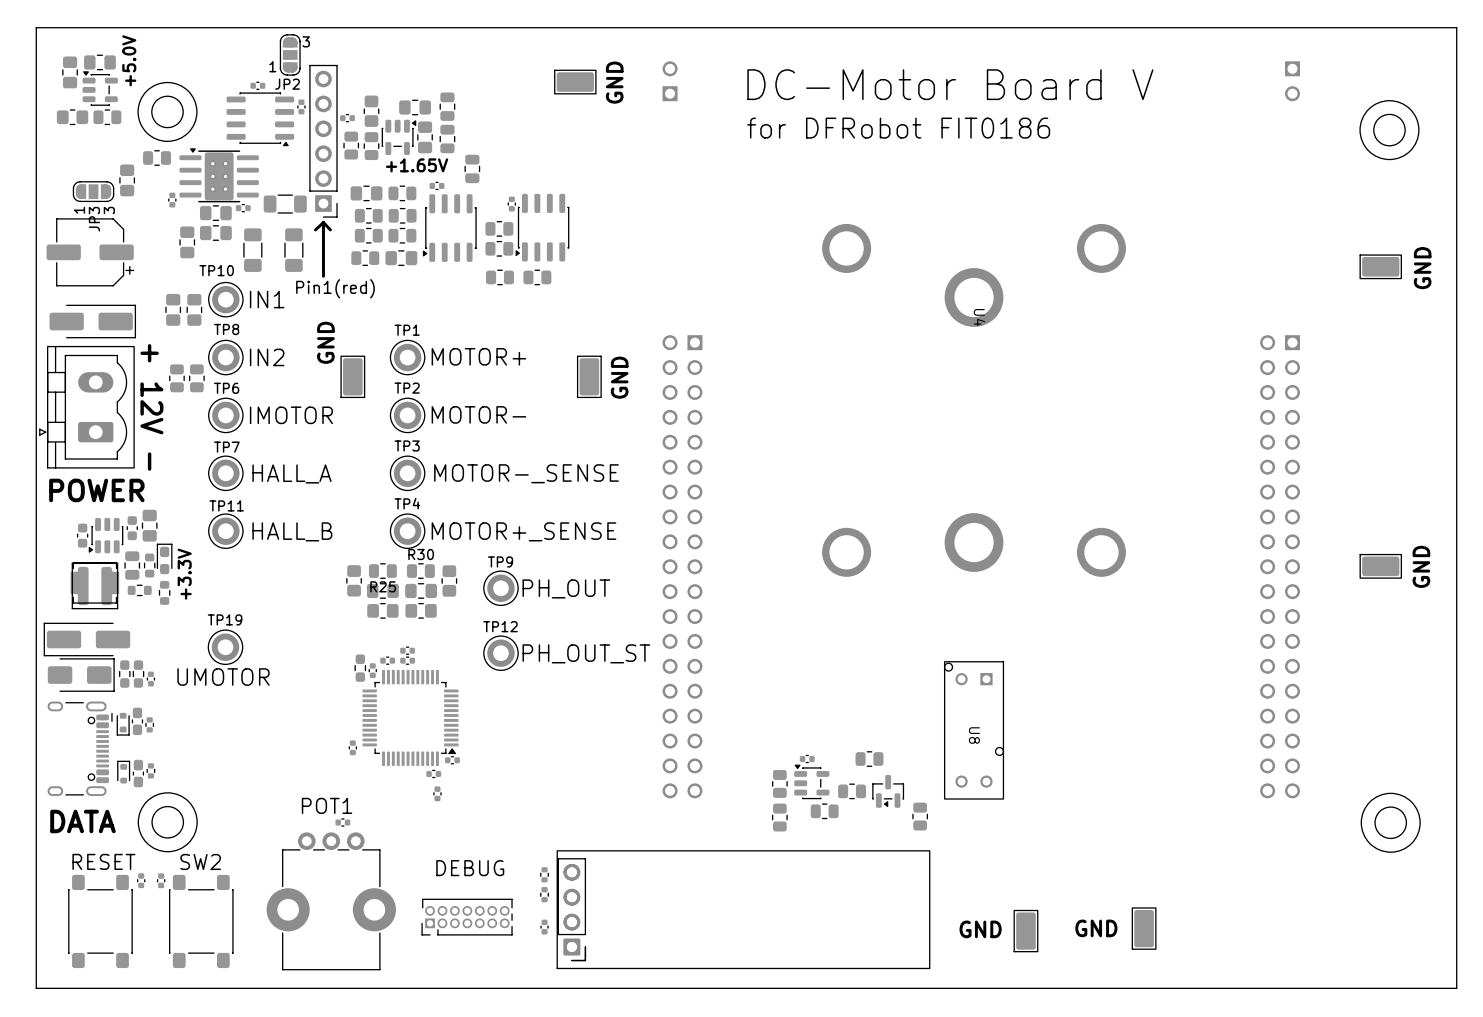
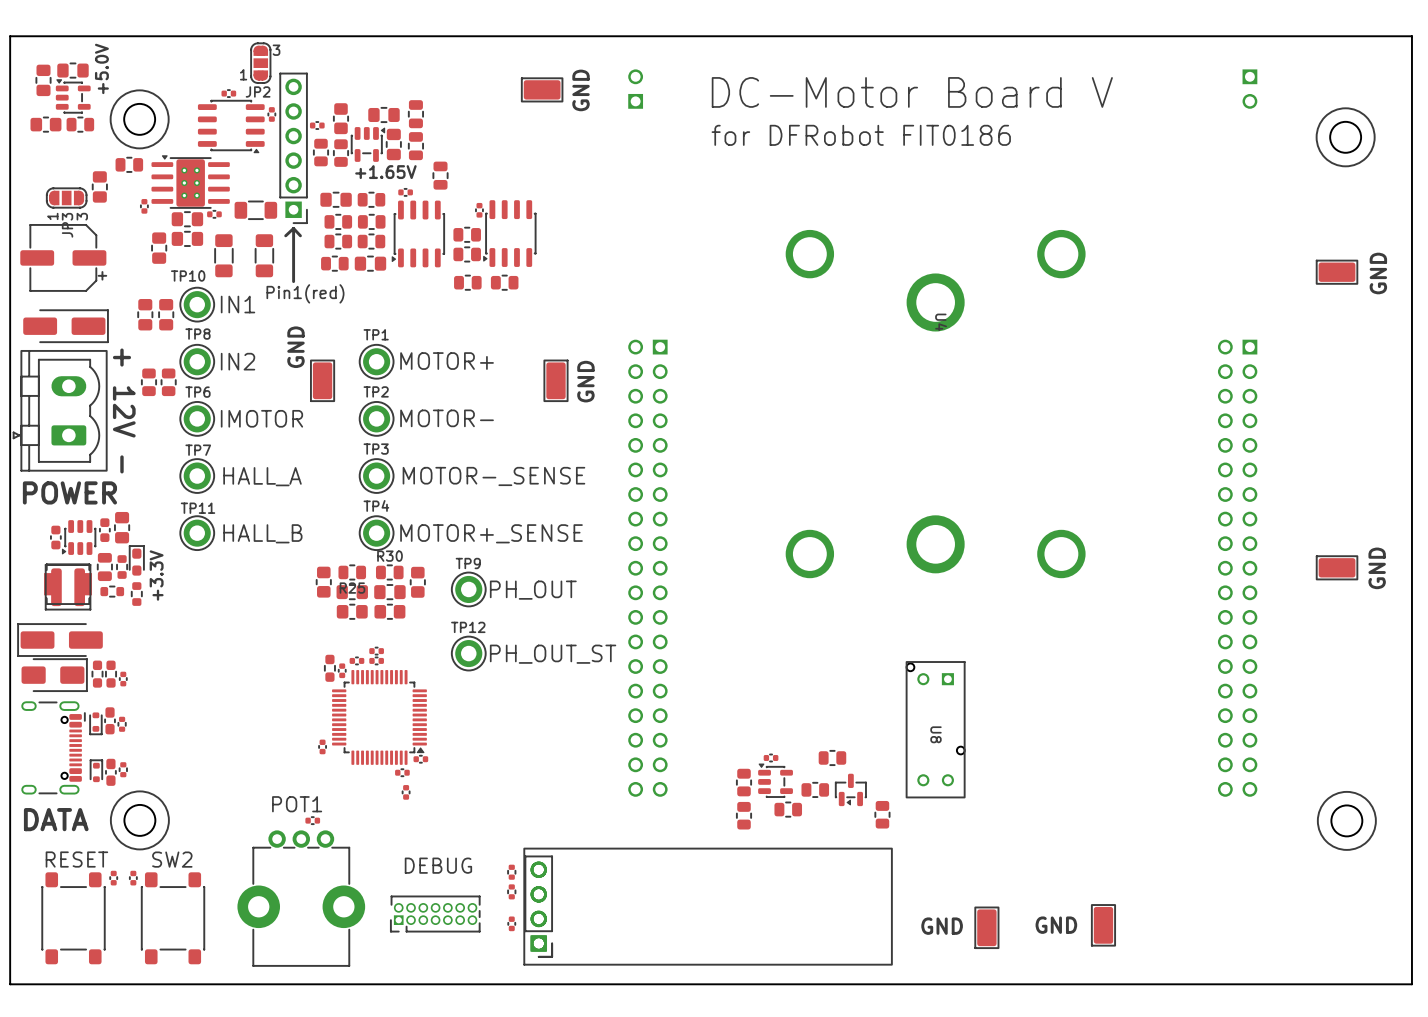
TP19: (225, 647) -> none
text: UMOTOR (223, 677) -> none

